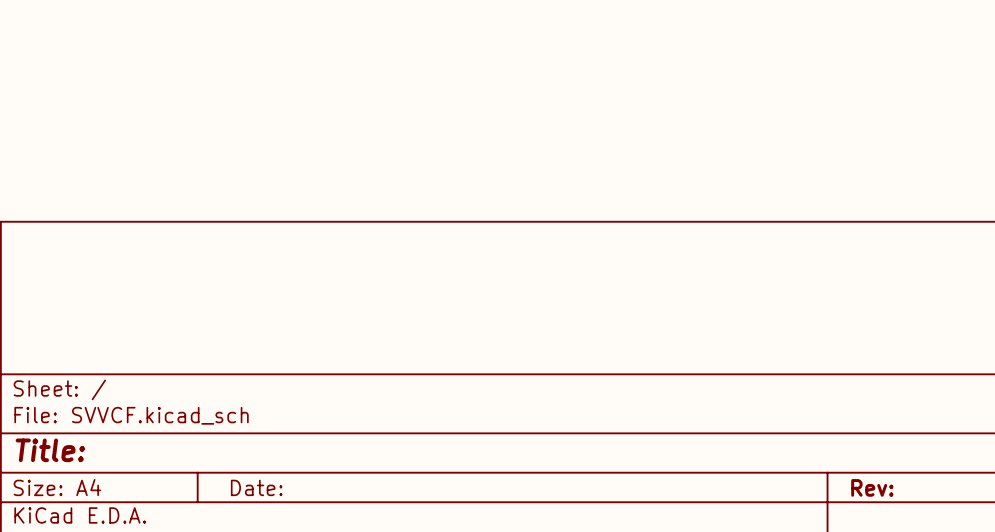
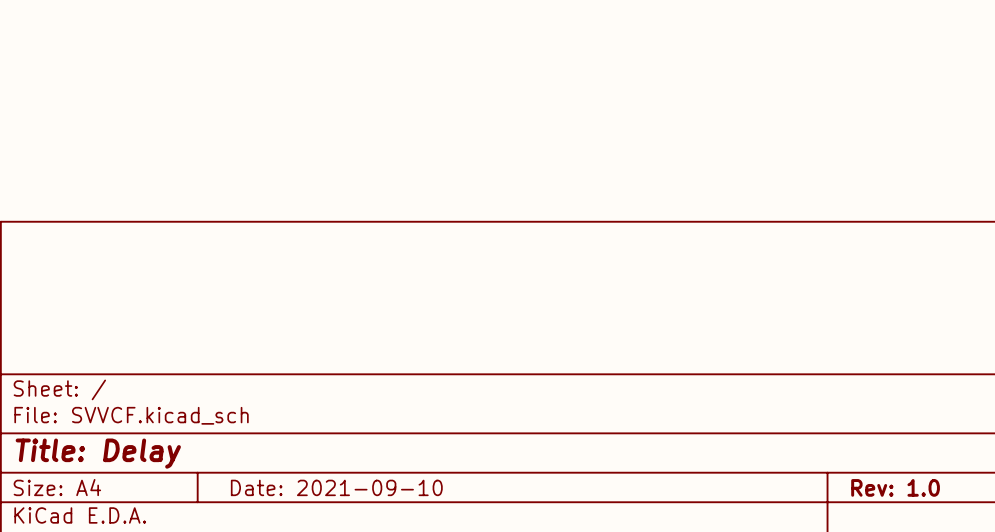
title block: Title: (50, 450) -> Title: Delay (98, 453)
title block: Date: (256, 487) -> Date: 2021-09-10 (336, 487)
title block: Rev: (872, 487) -> Rev: 1.0 (895, 487)

